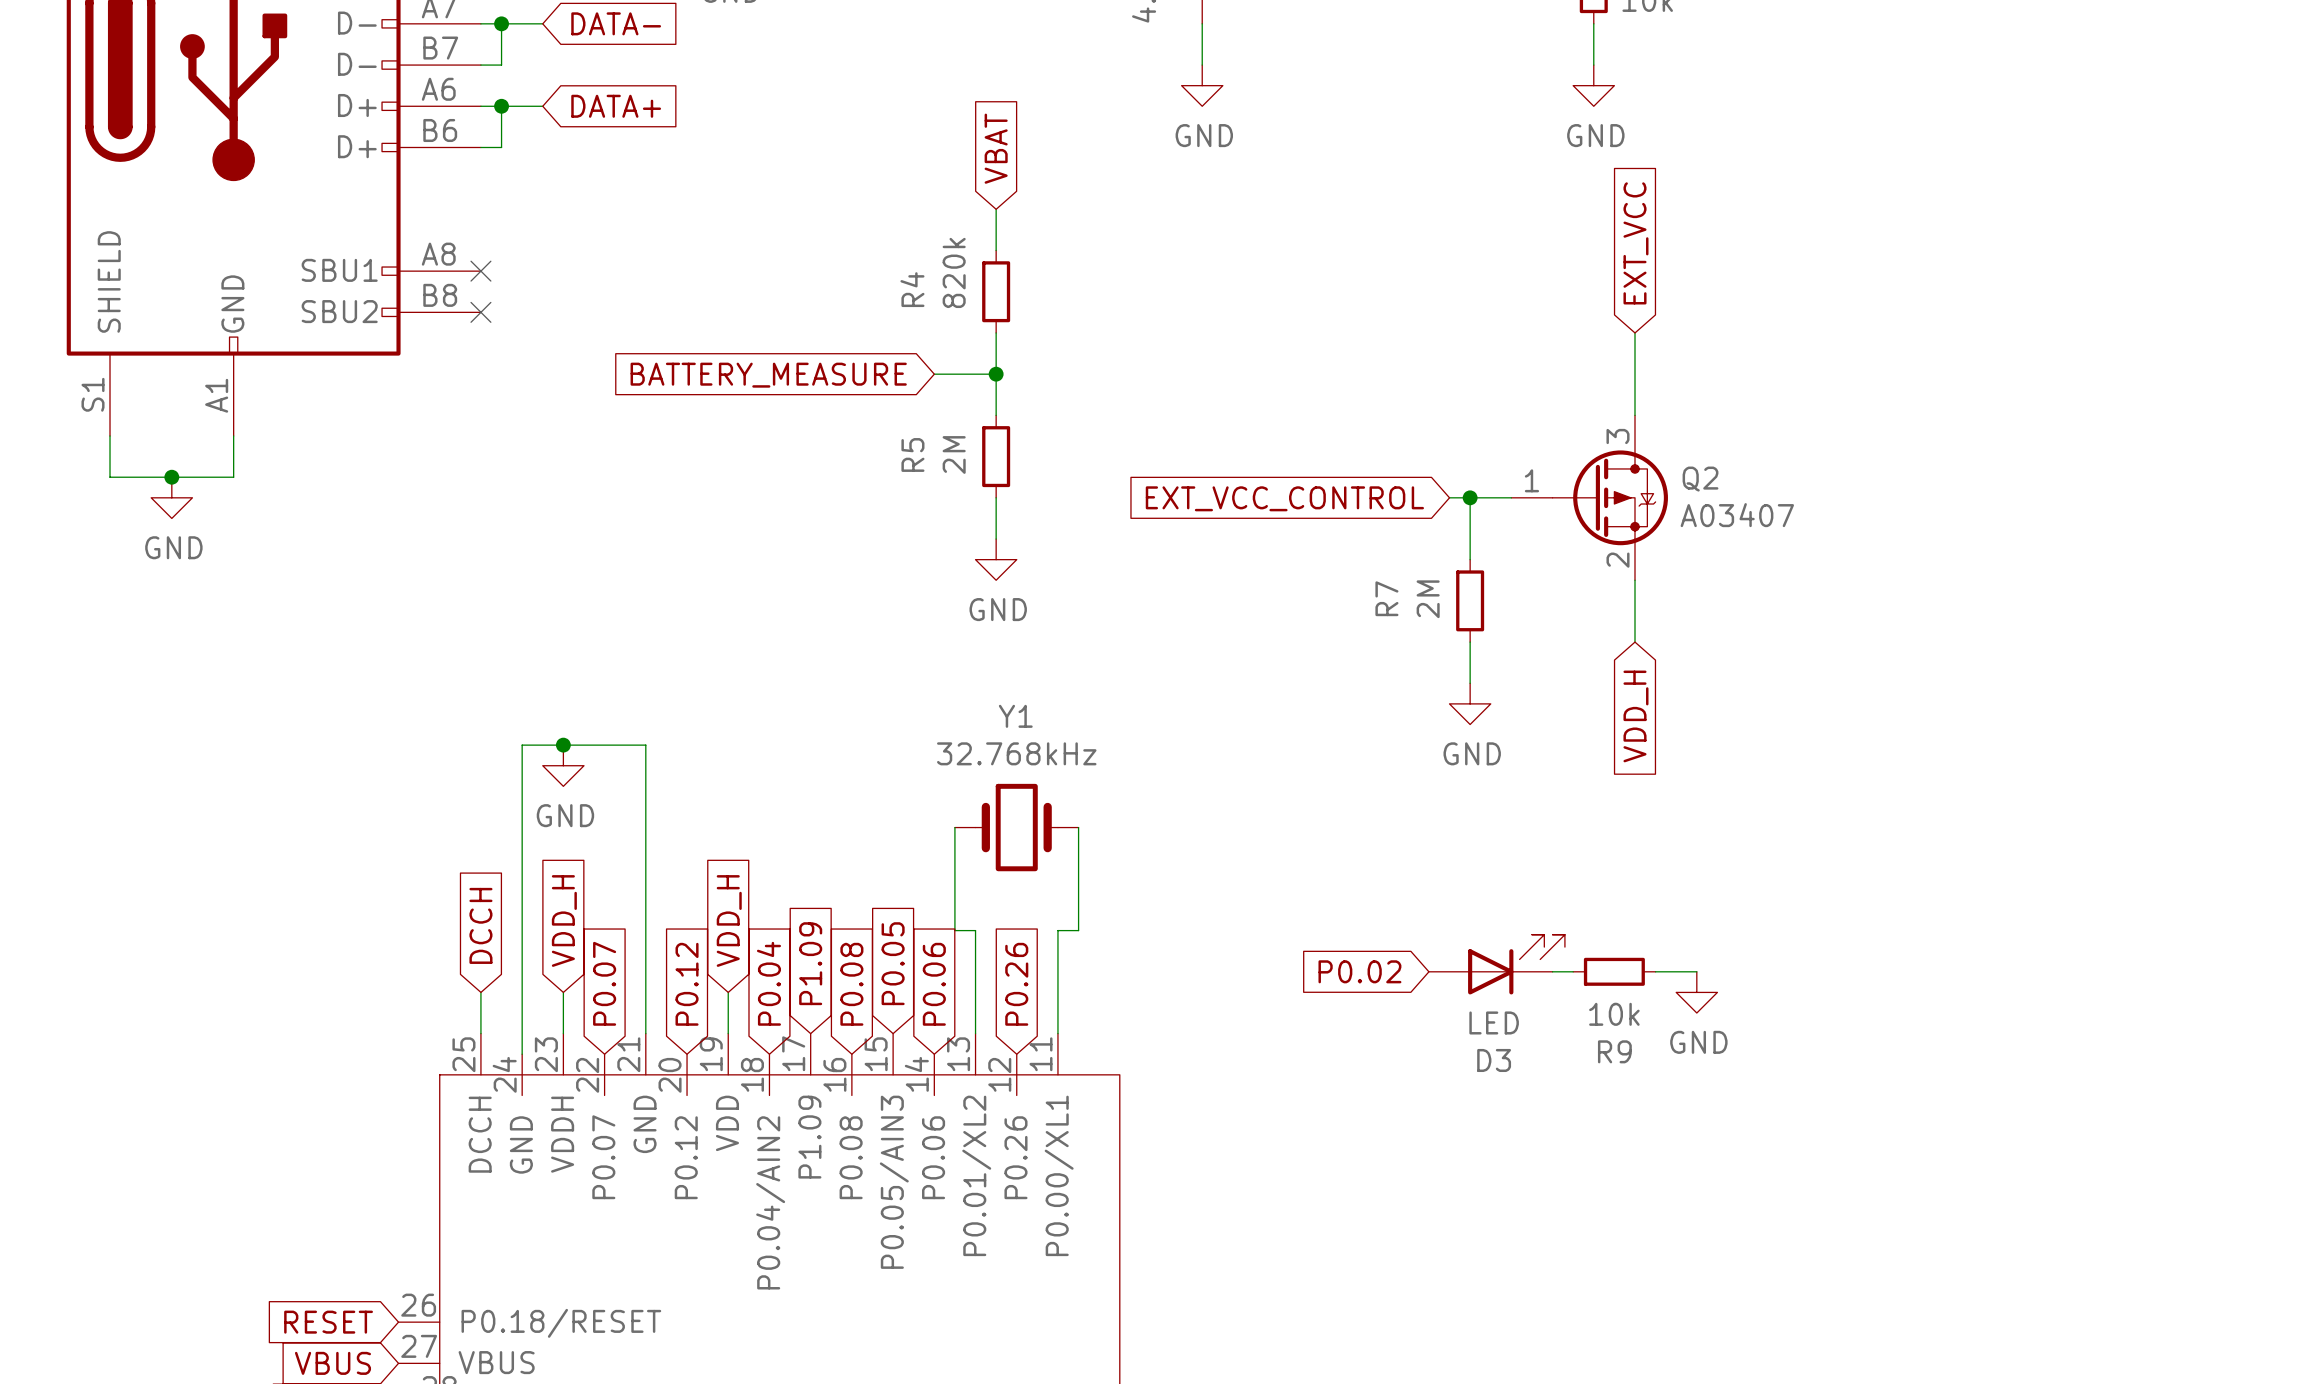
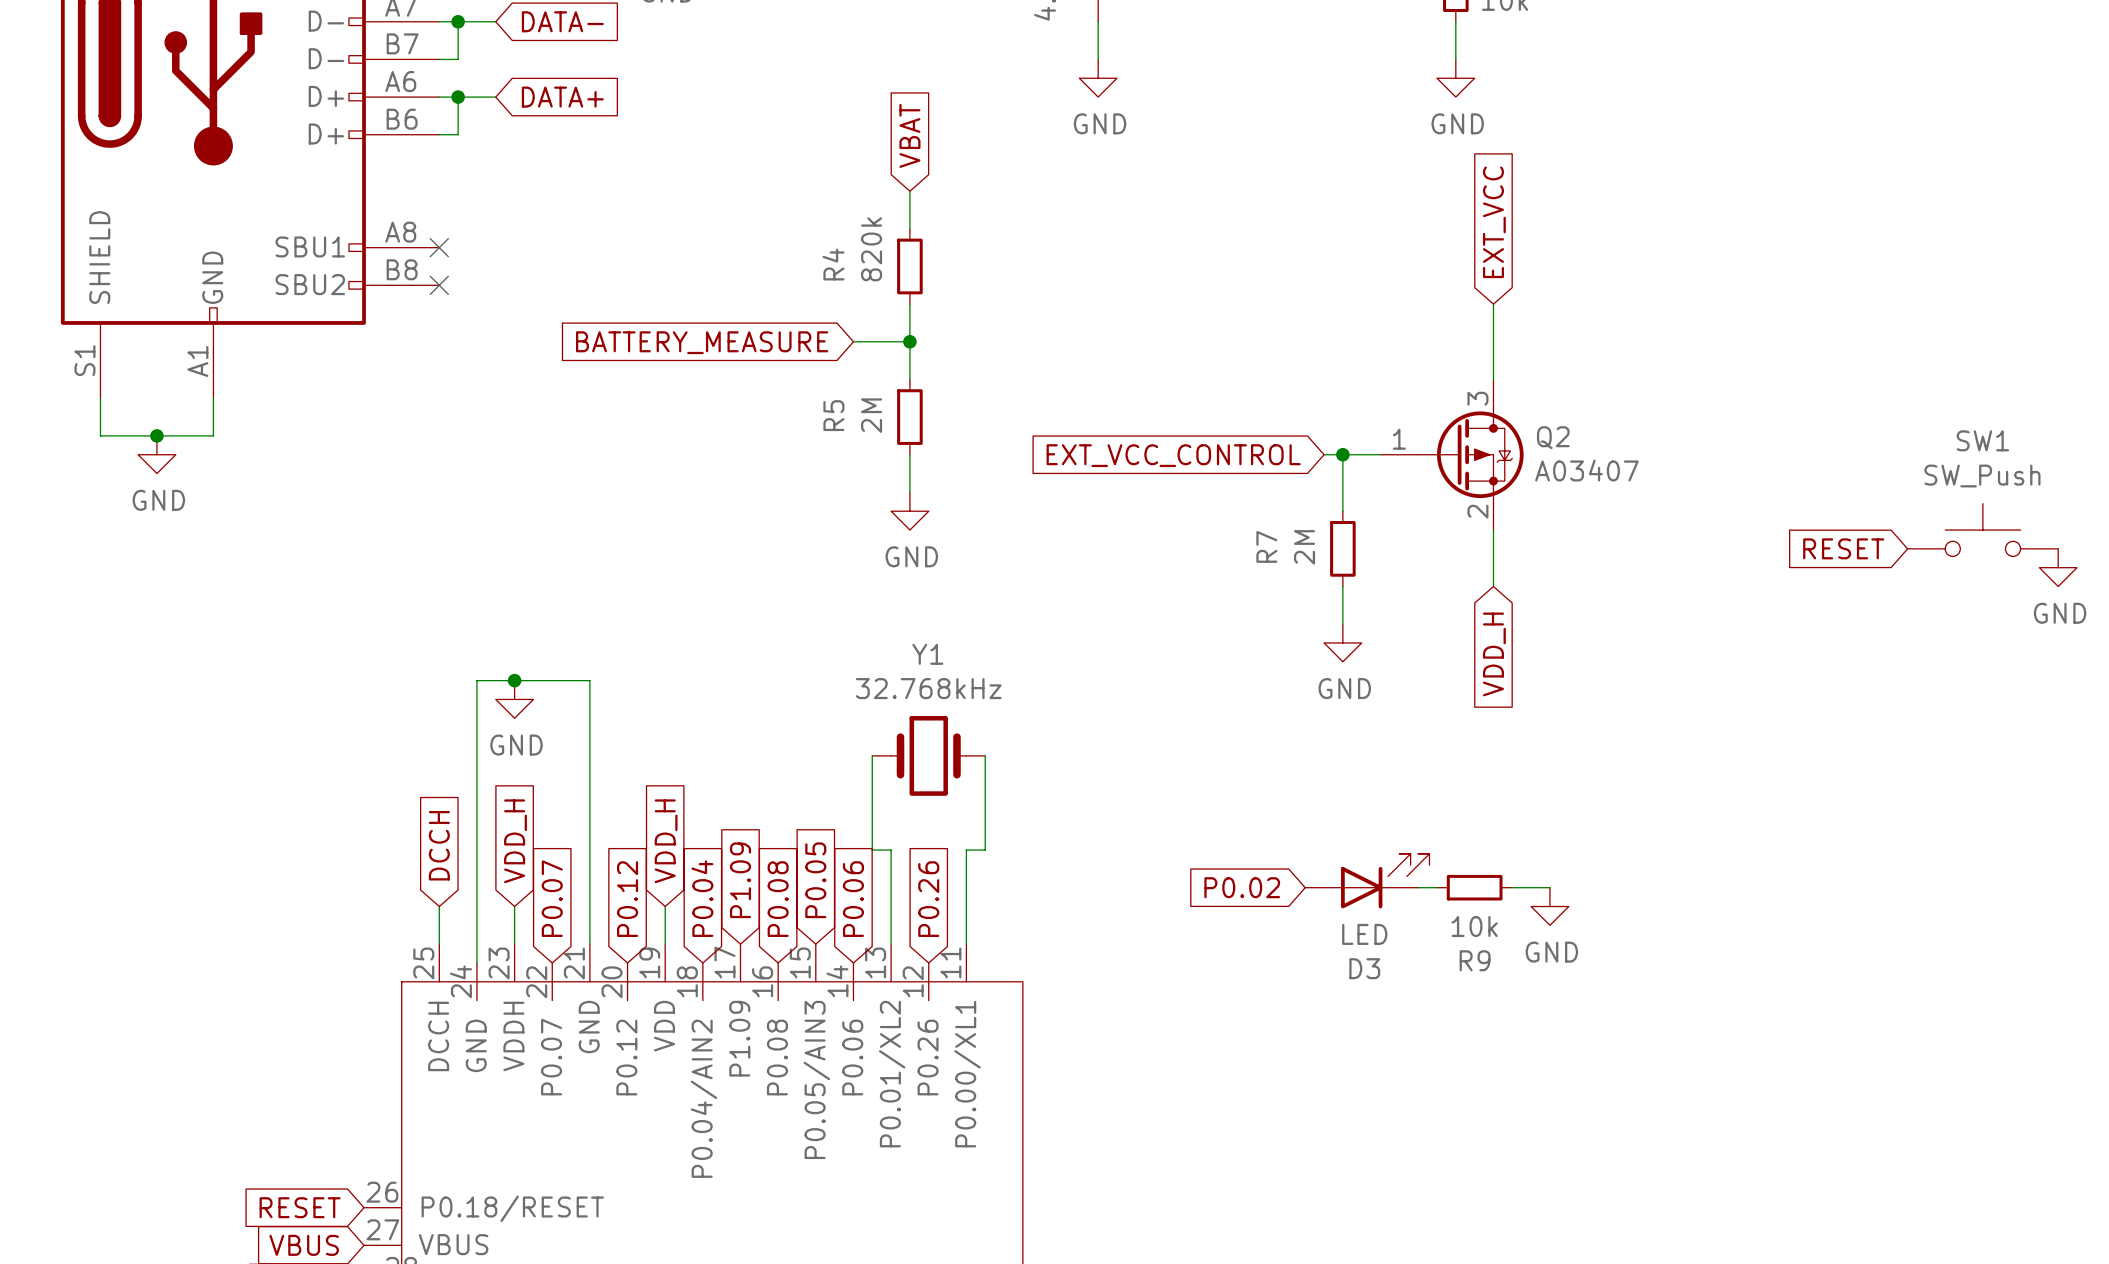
SW1: none -> SW_Push (1982, 530)
global label: none -> RESET (1843, 548)
power symbol: none -> GND (2058, 567)

